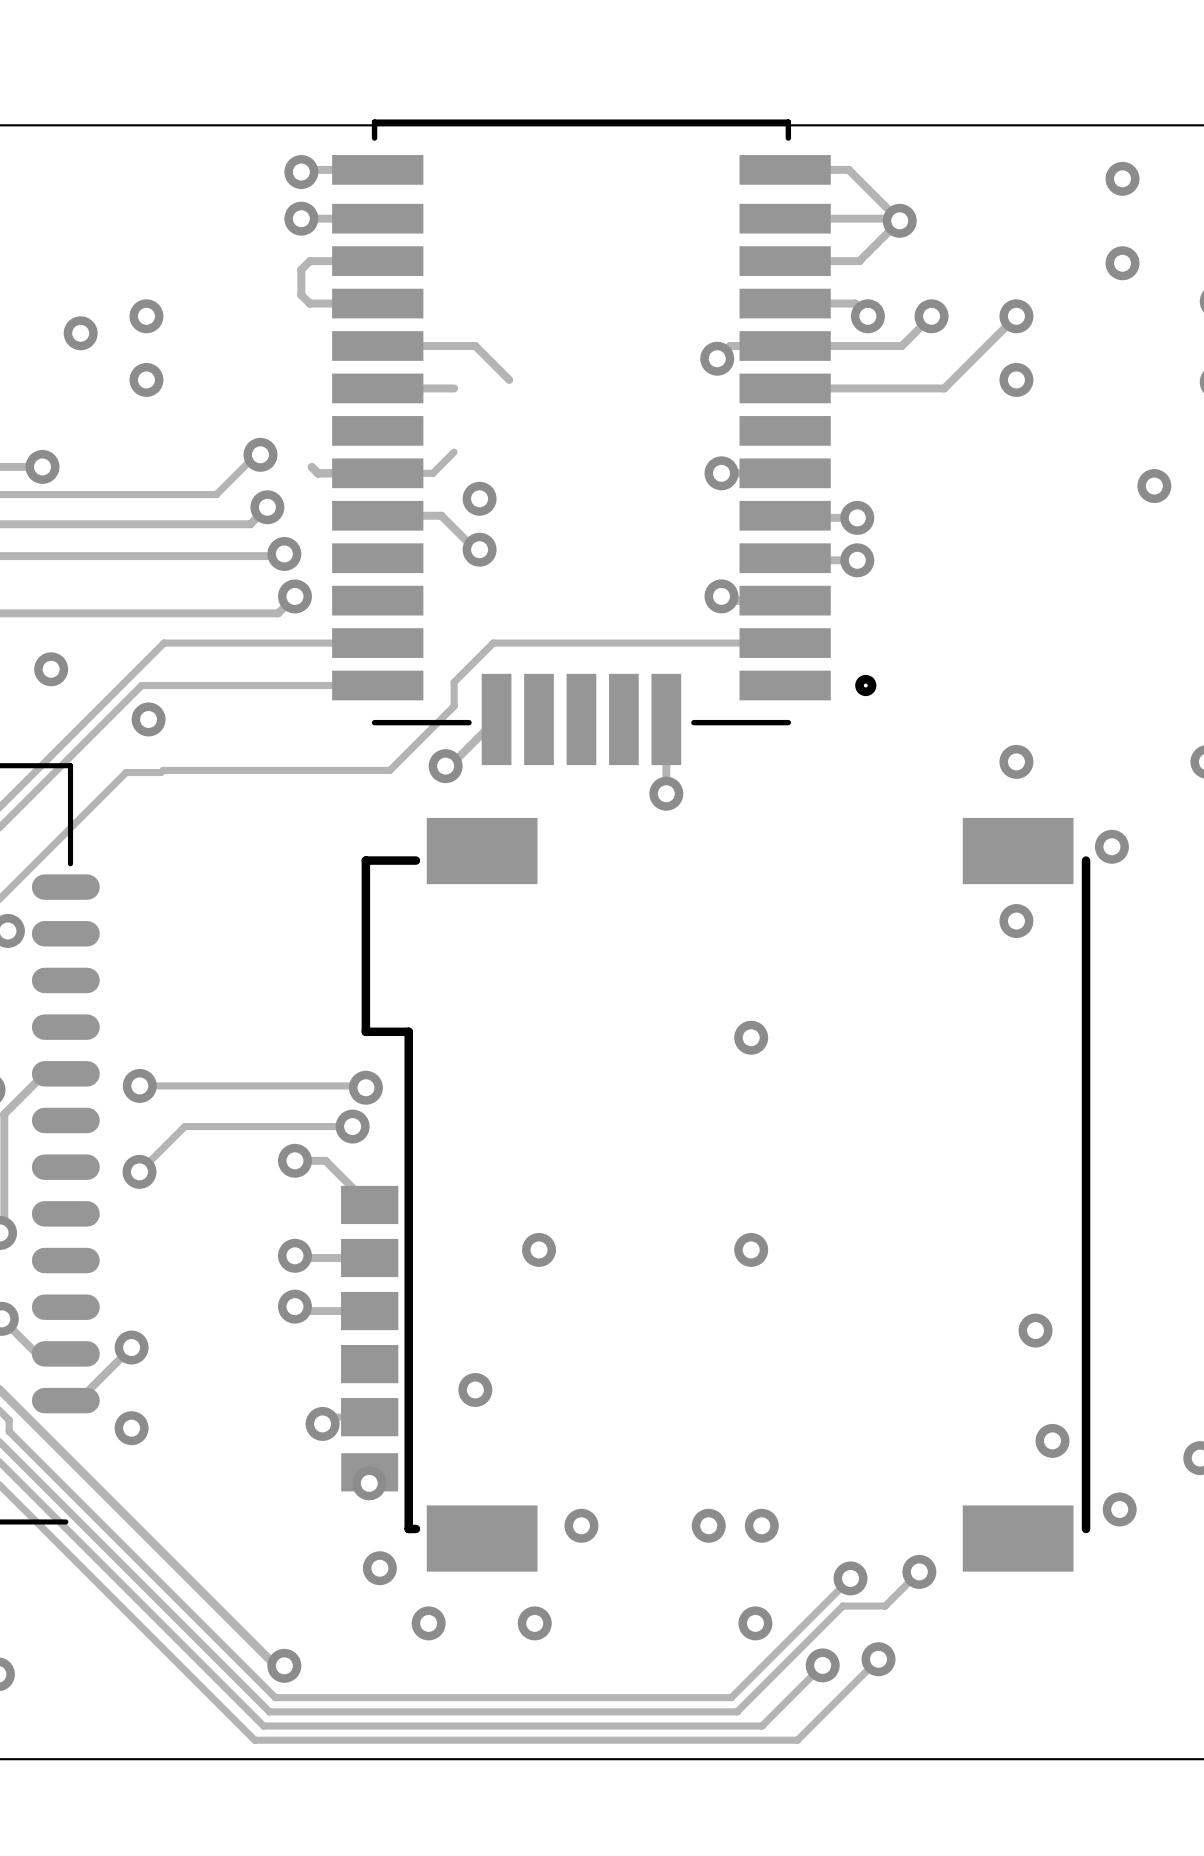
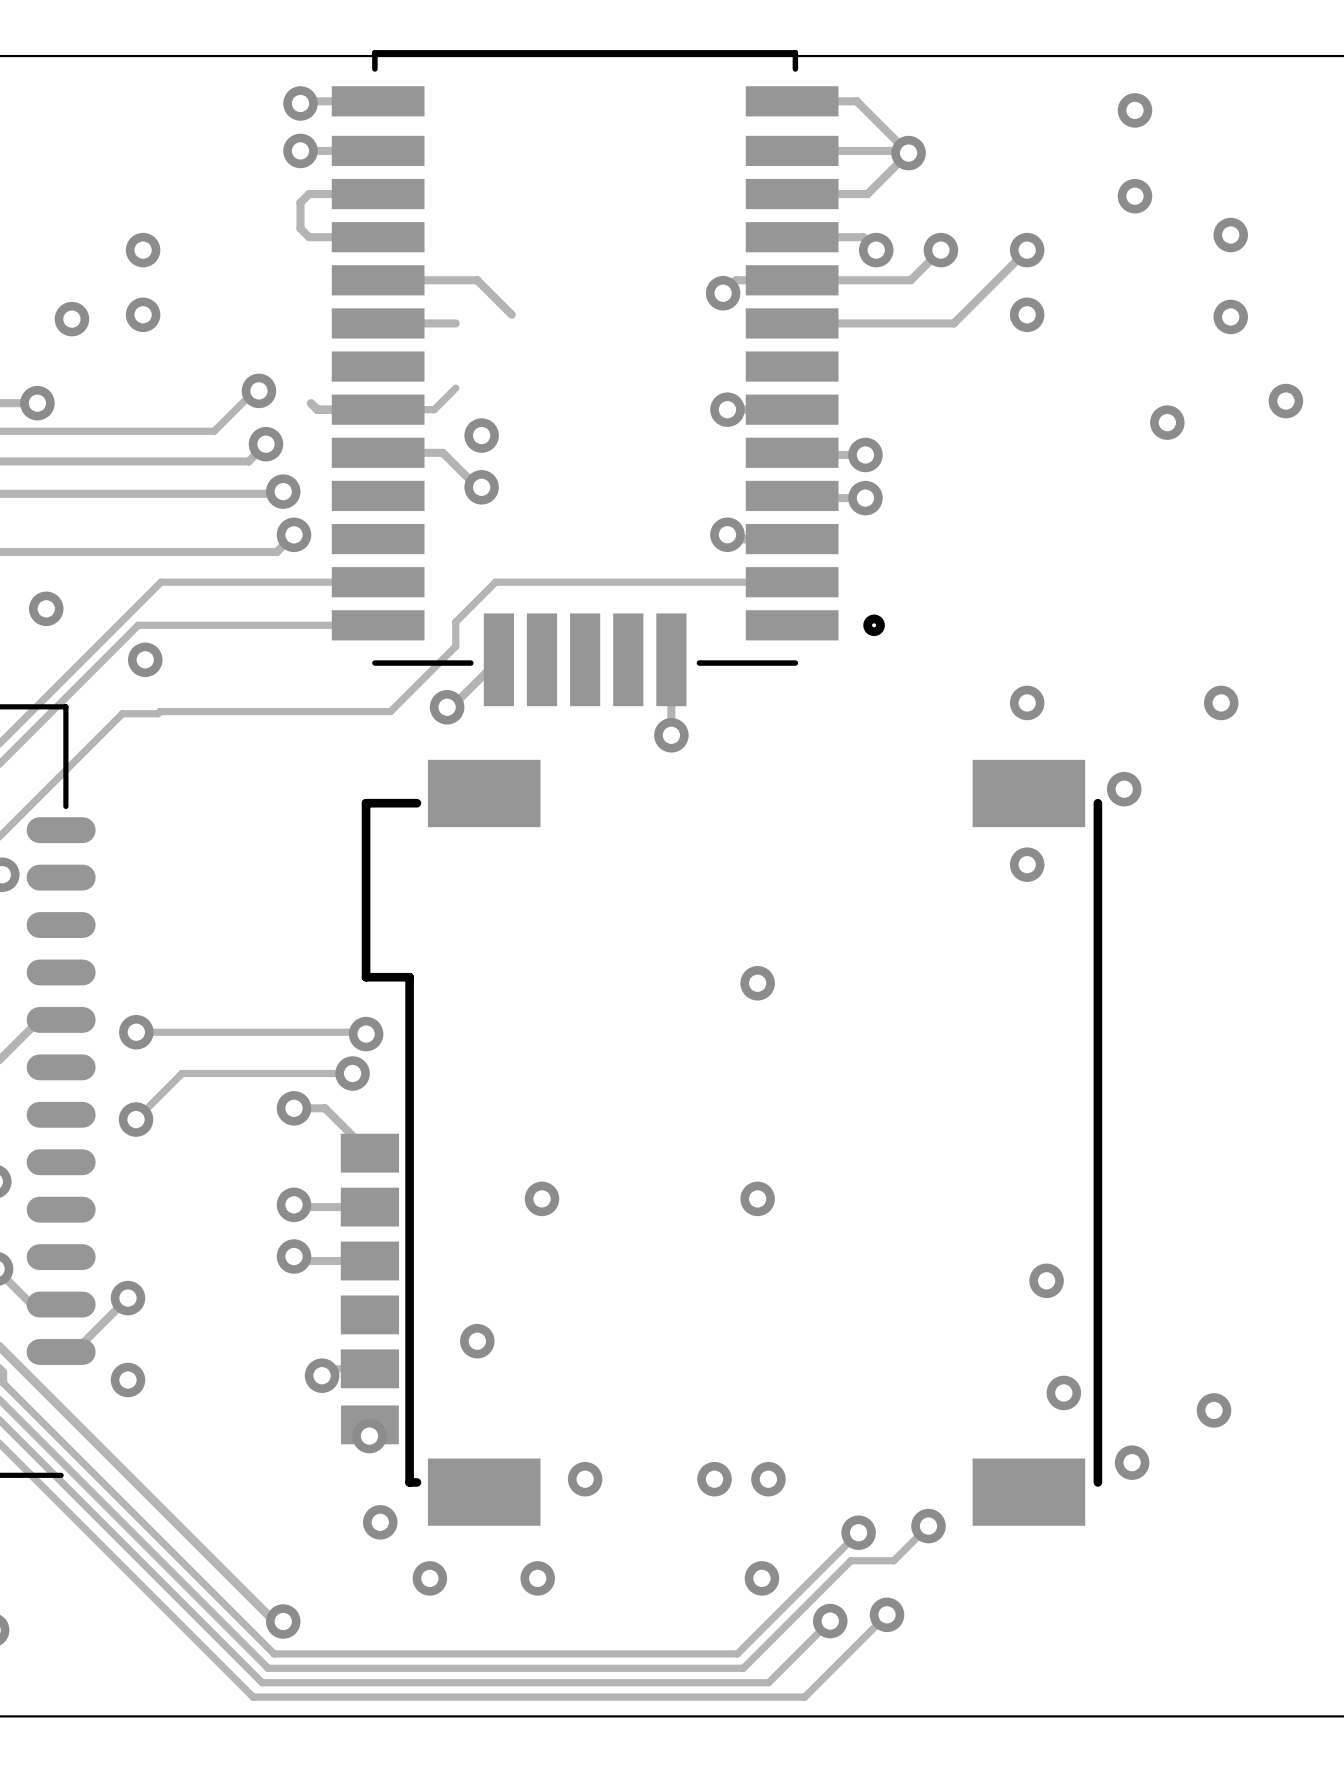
via position: (80, 333) -> (71, 319)

